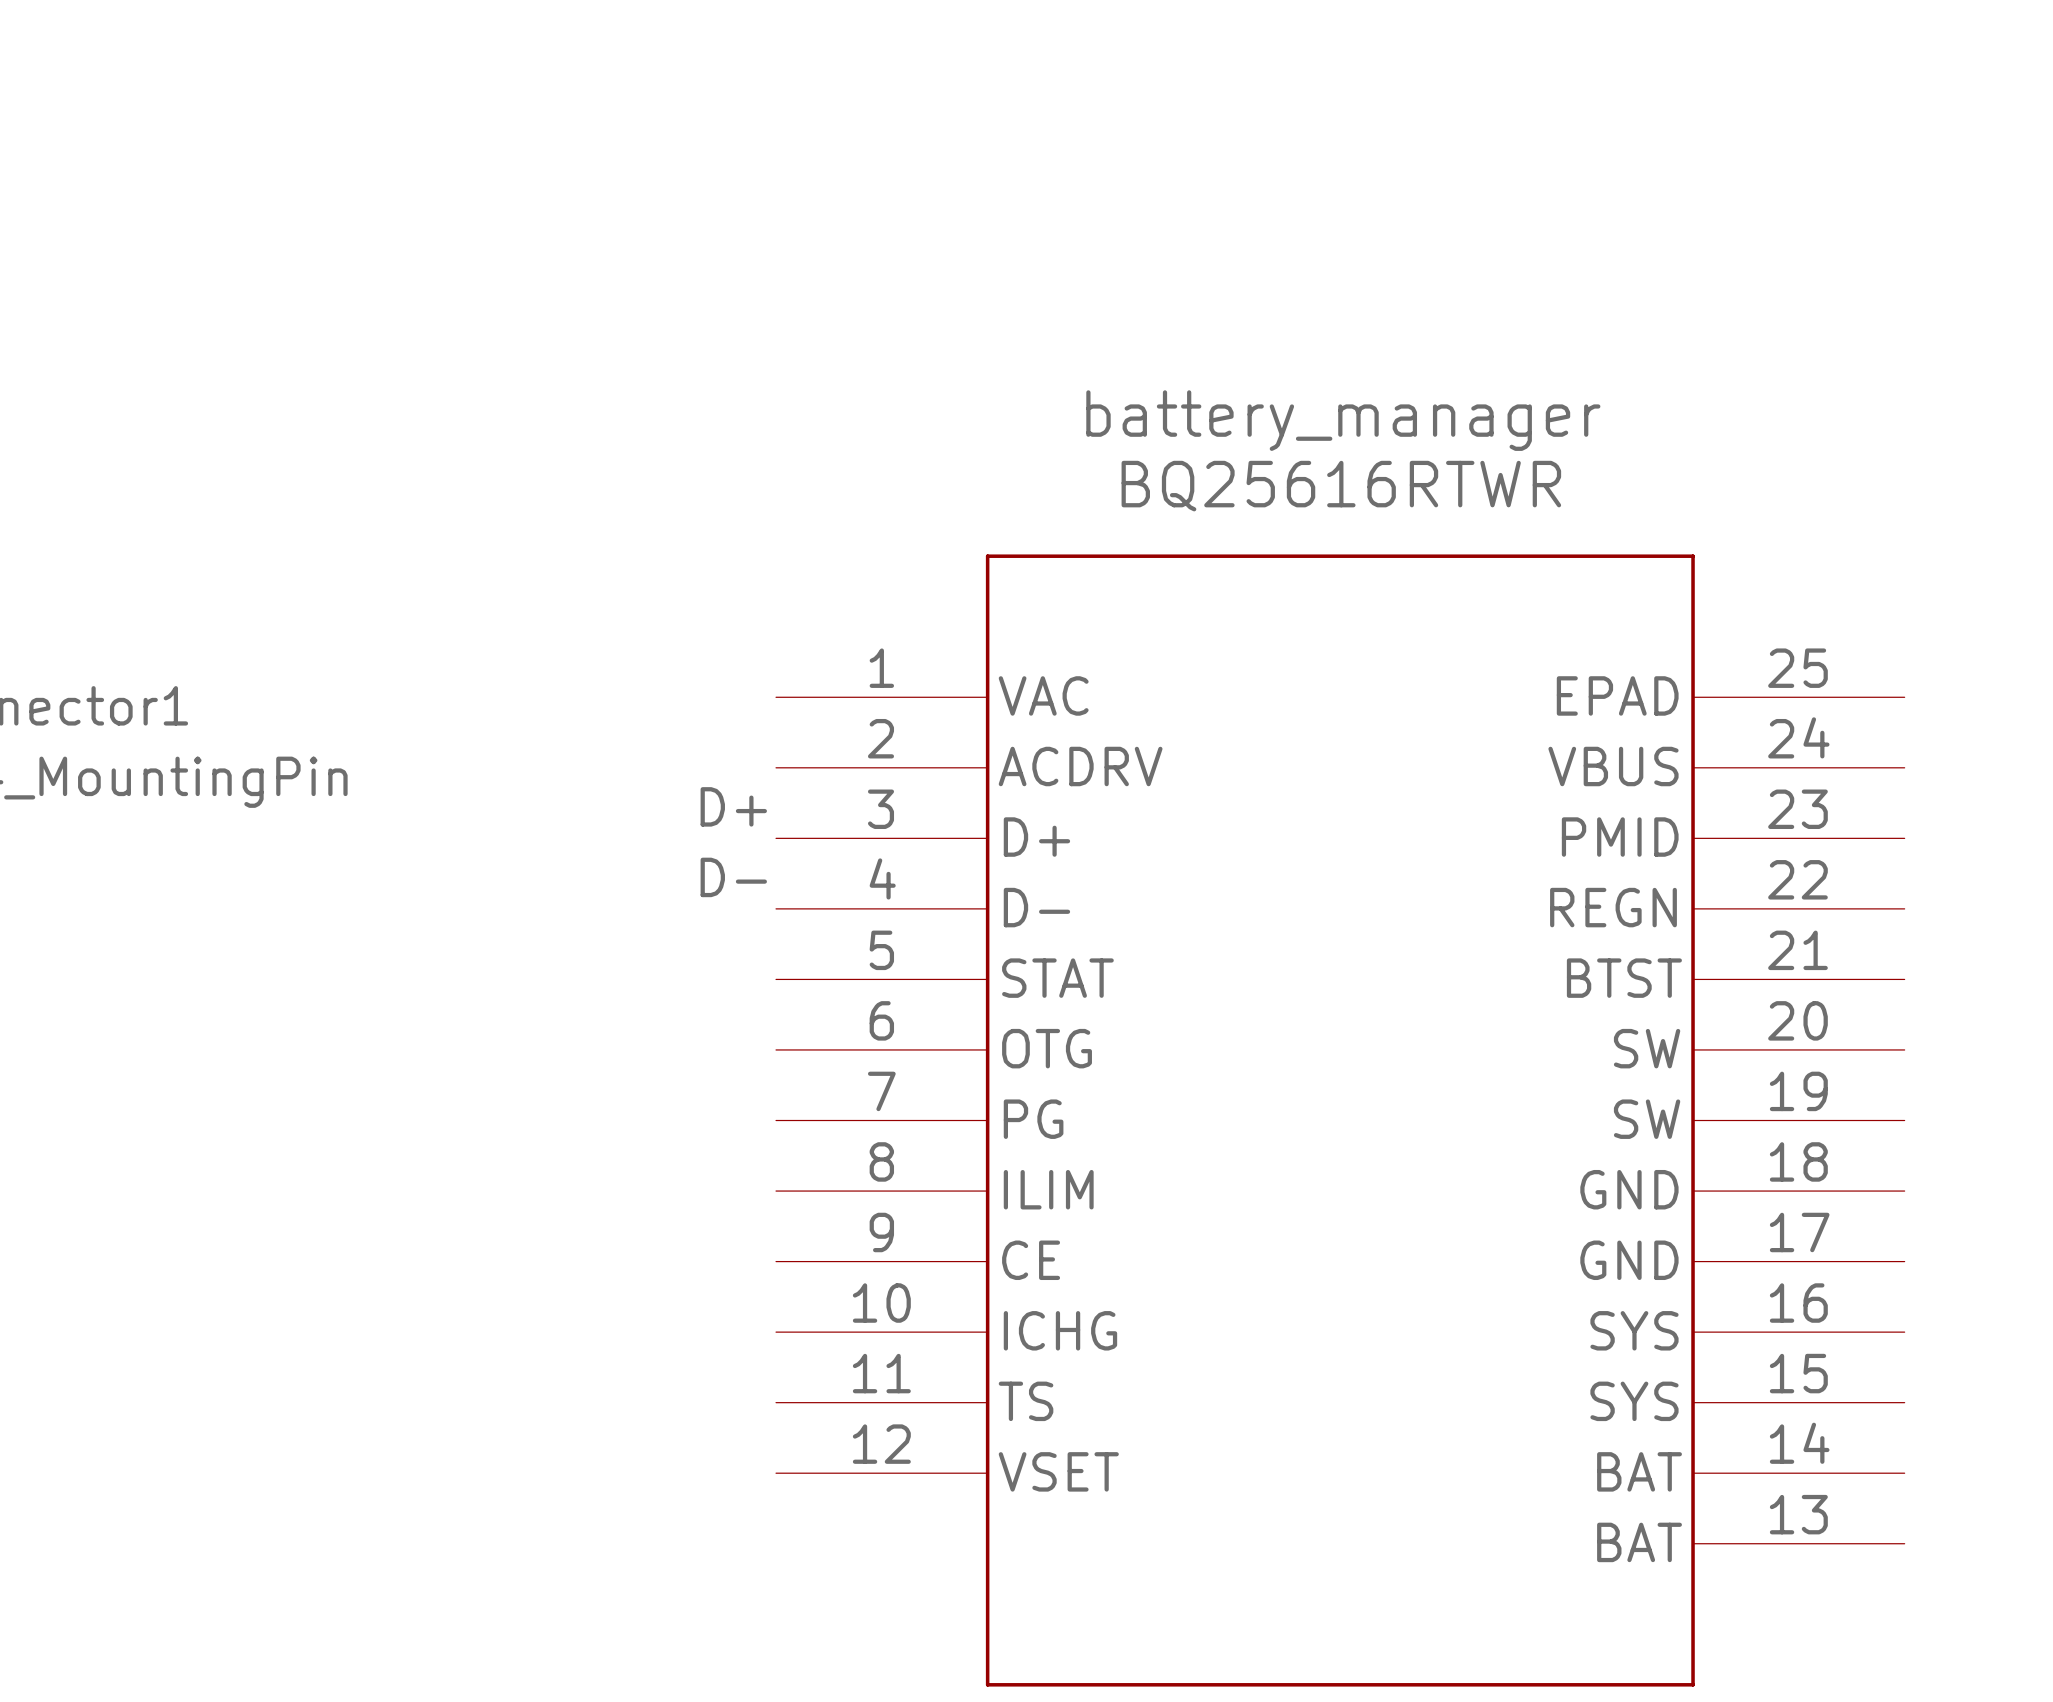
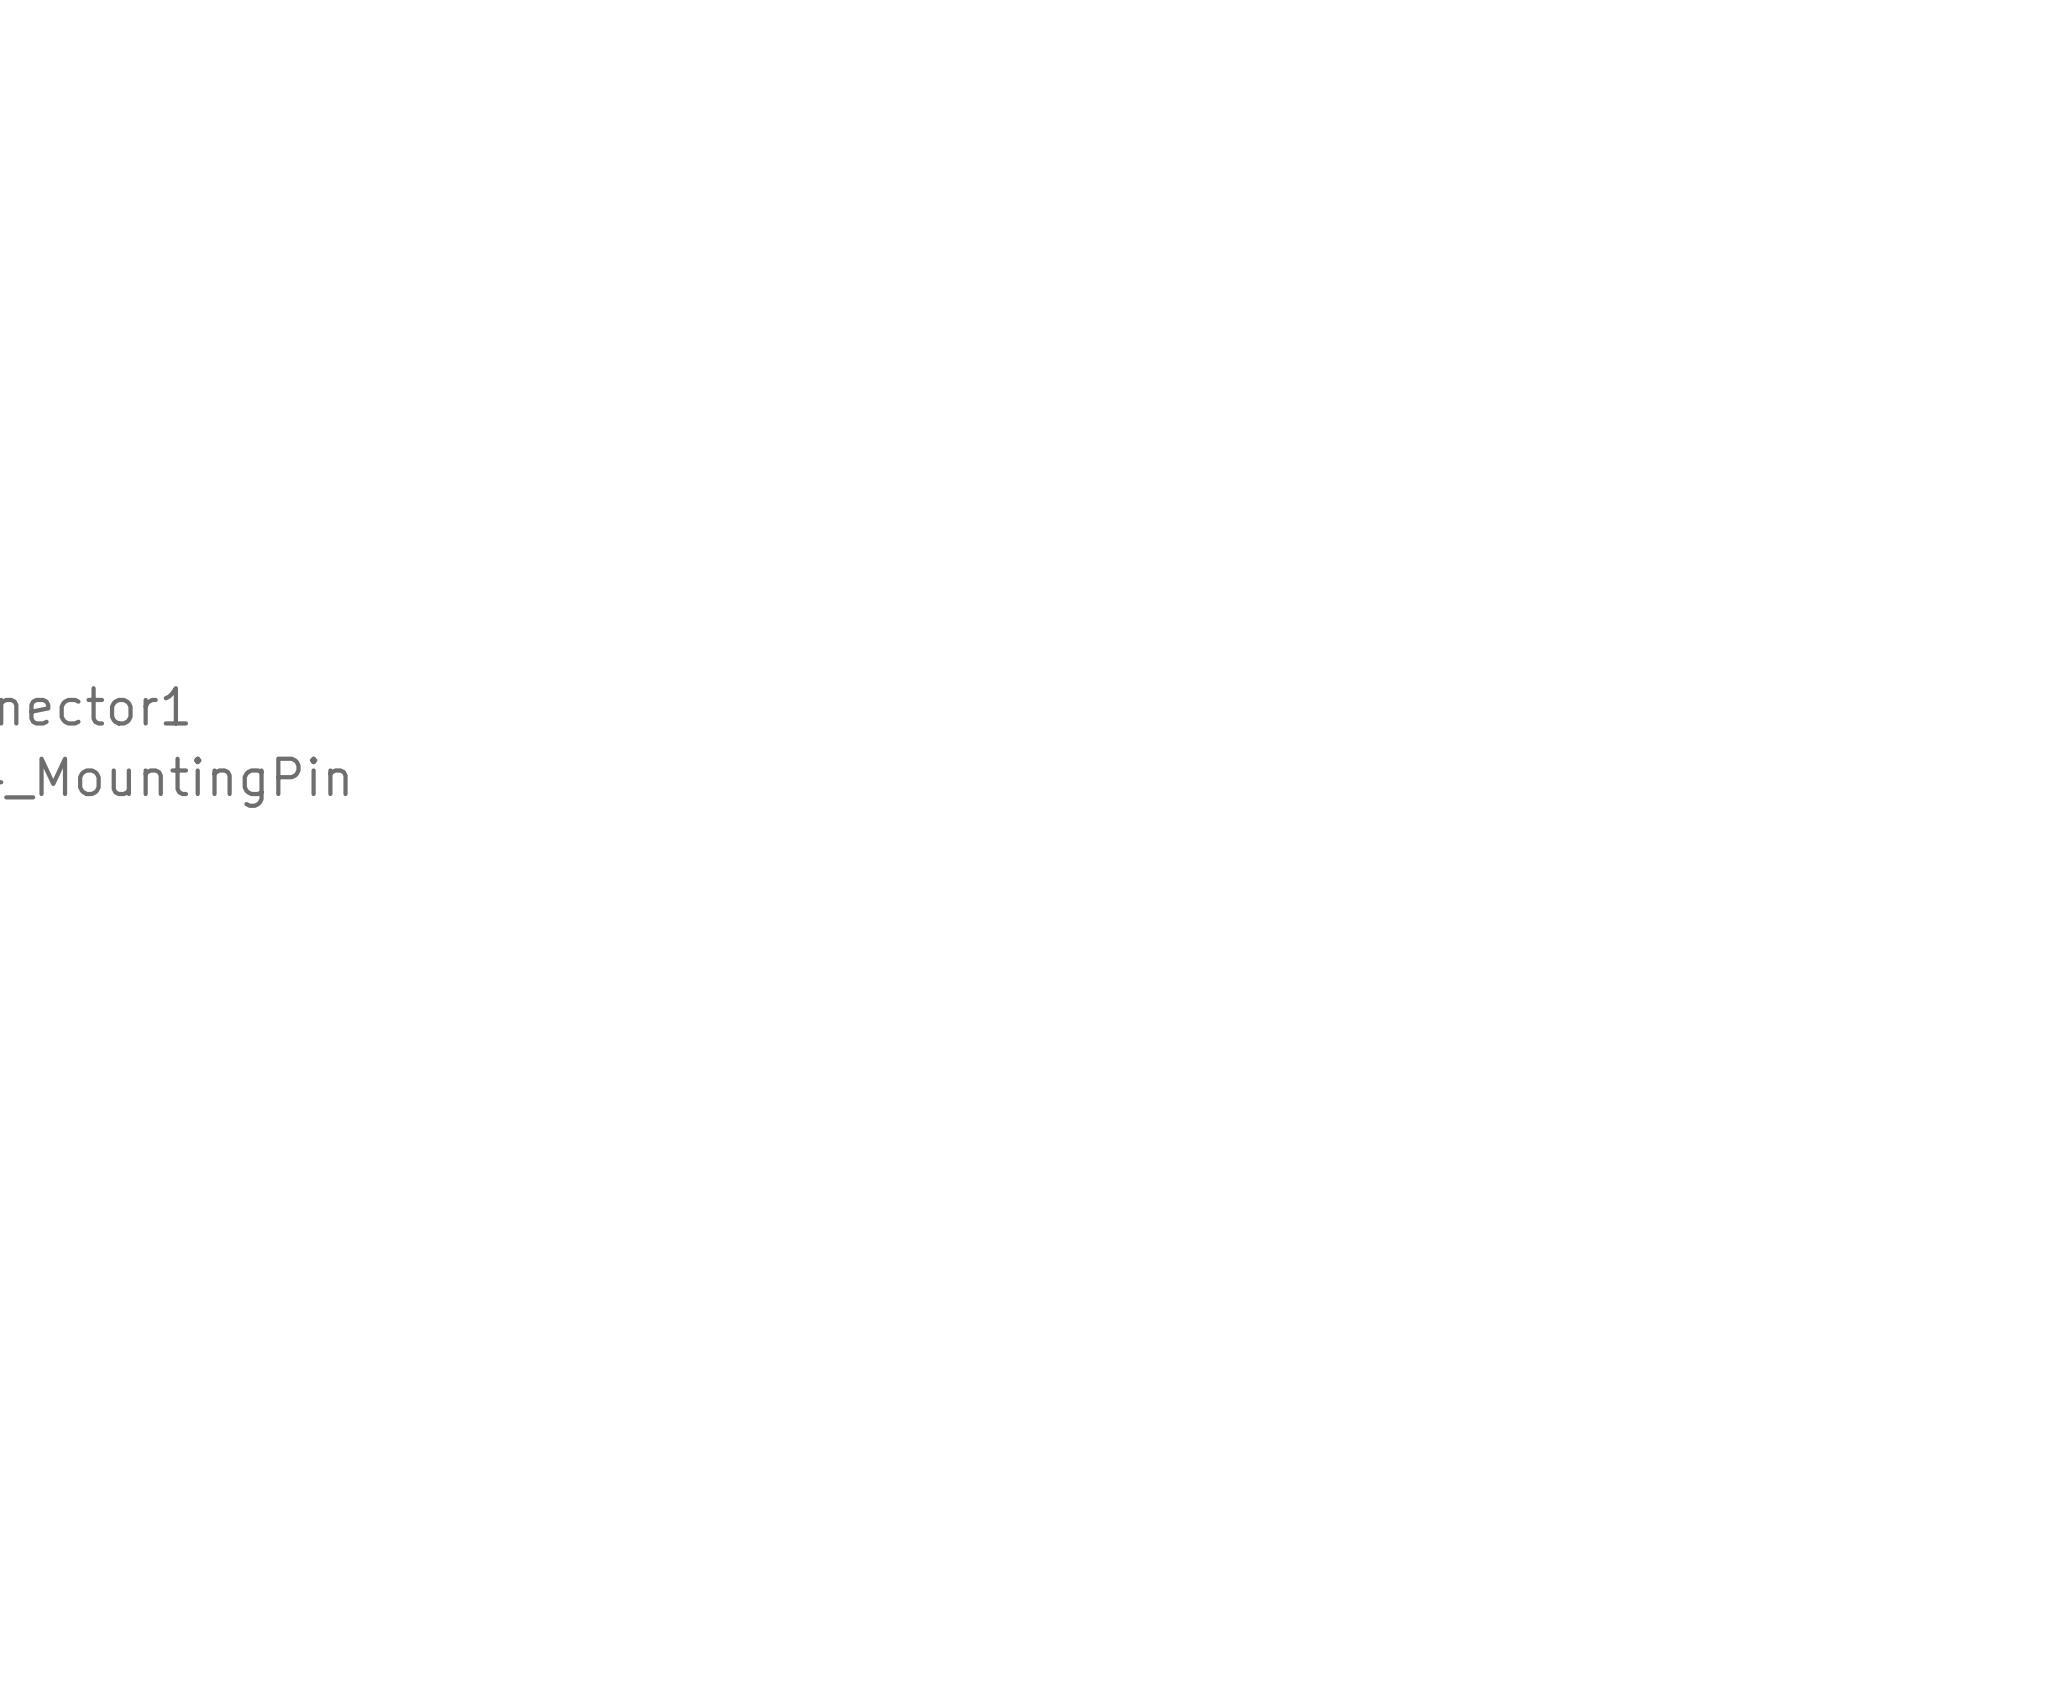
label: D+ (733, 806) -> none
label: D- (733, 877) -> none
battery_manager: BQ25616RTWR (1340, 1120) -> none

